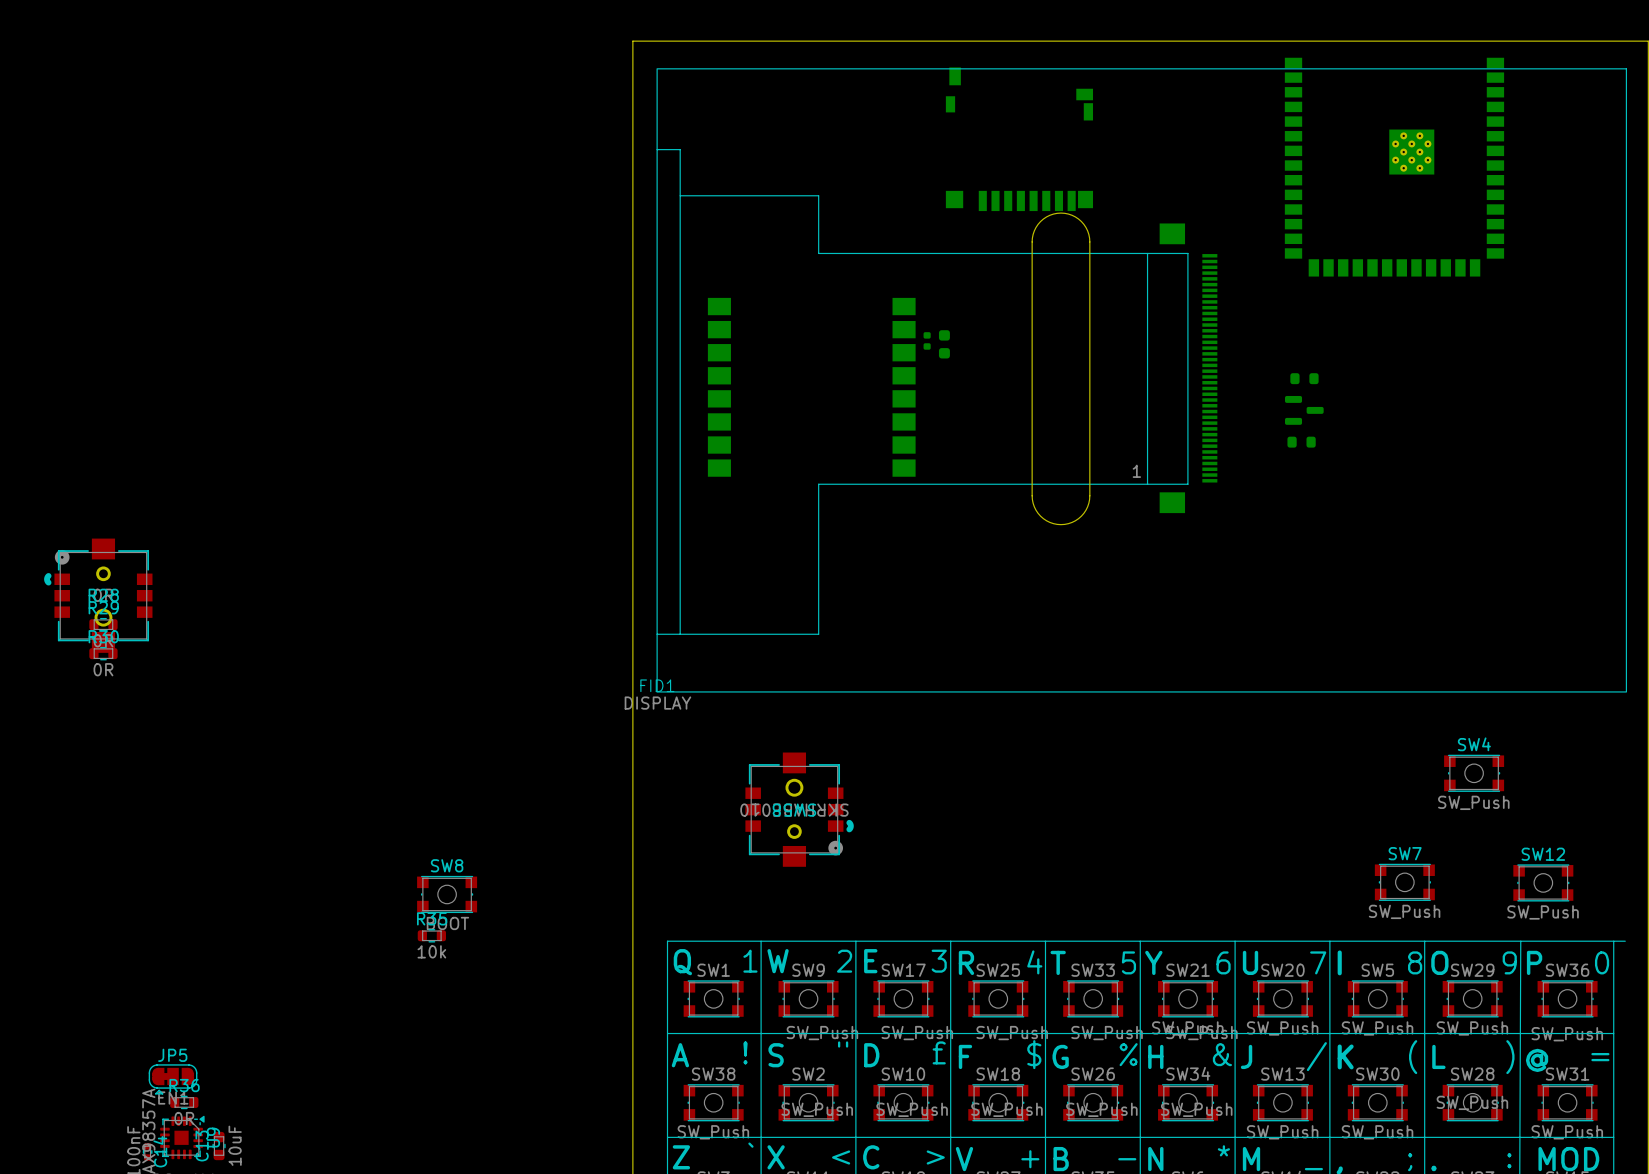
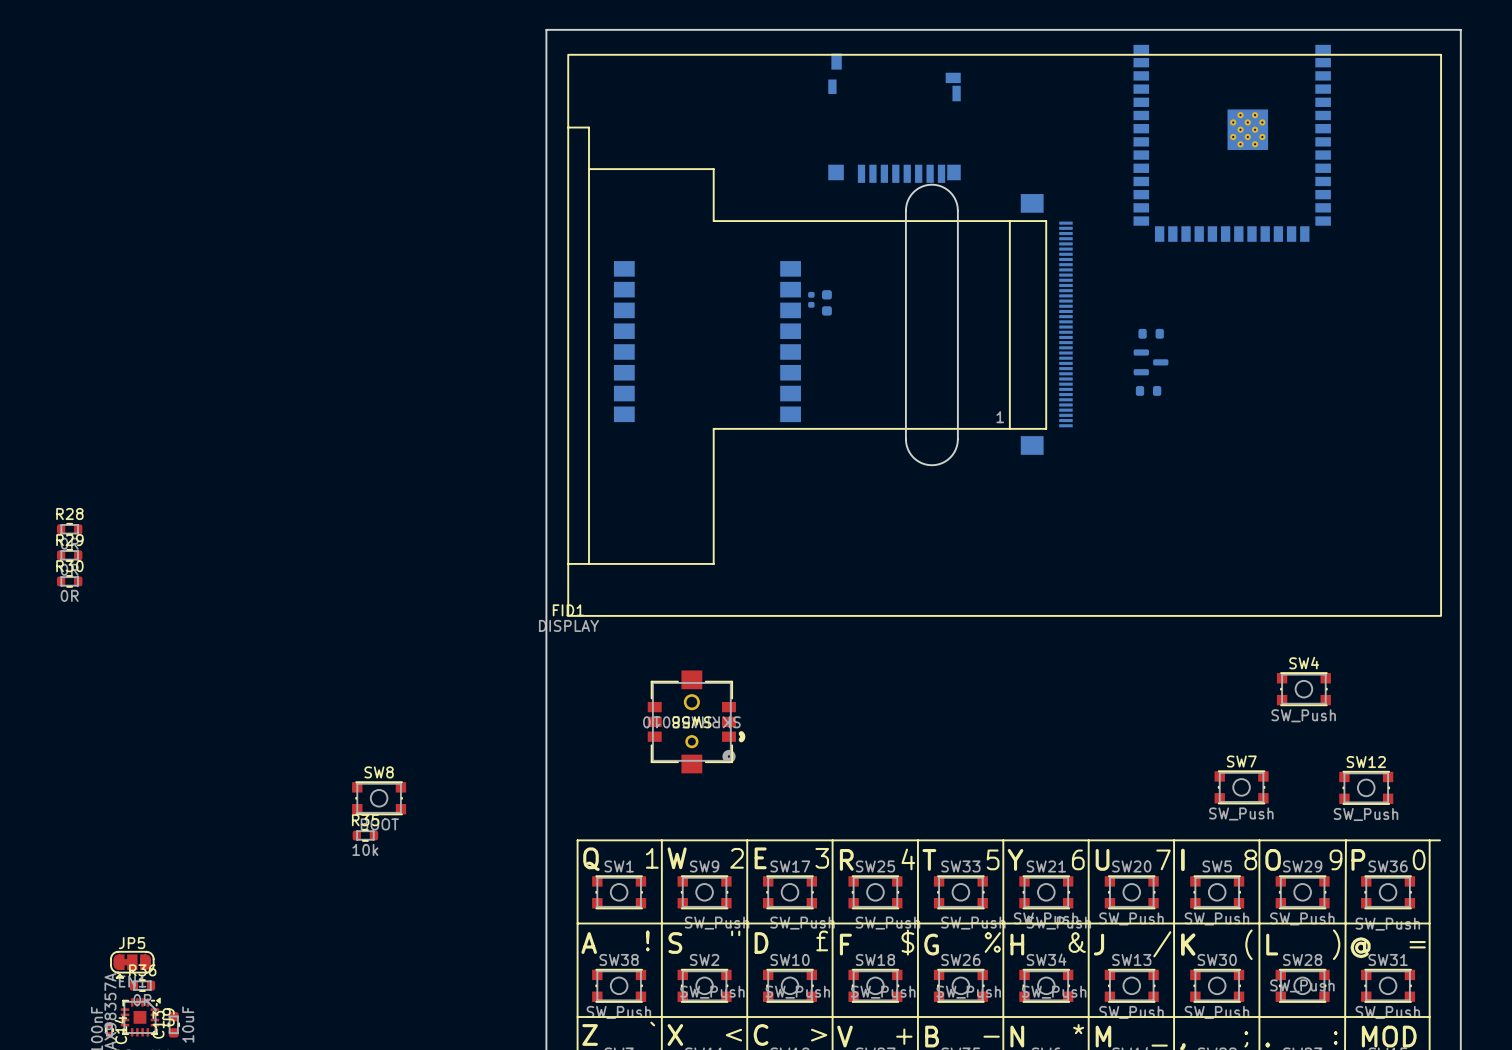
R28 footprint: [44, 538, 153, 653] -> [56, 523, 83, 536]

